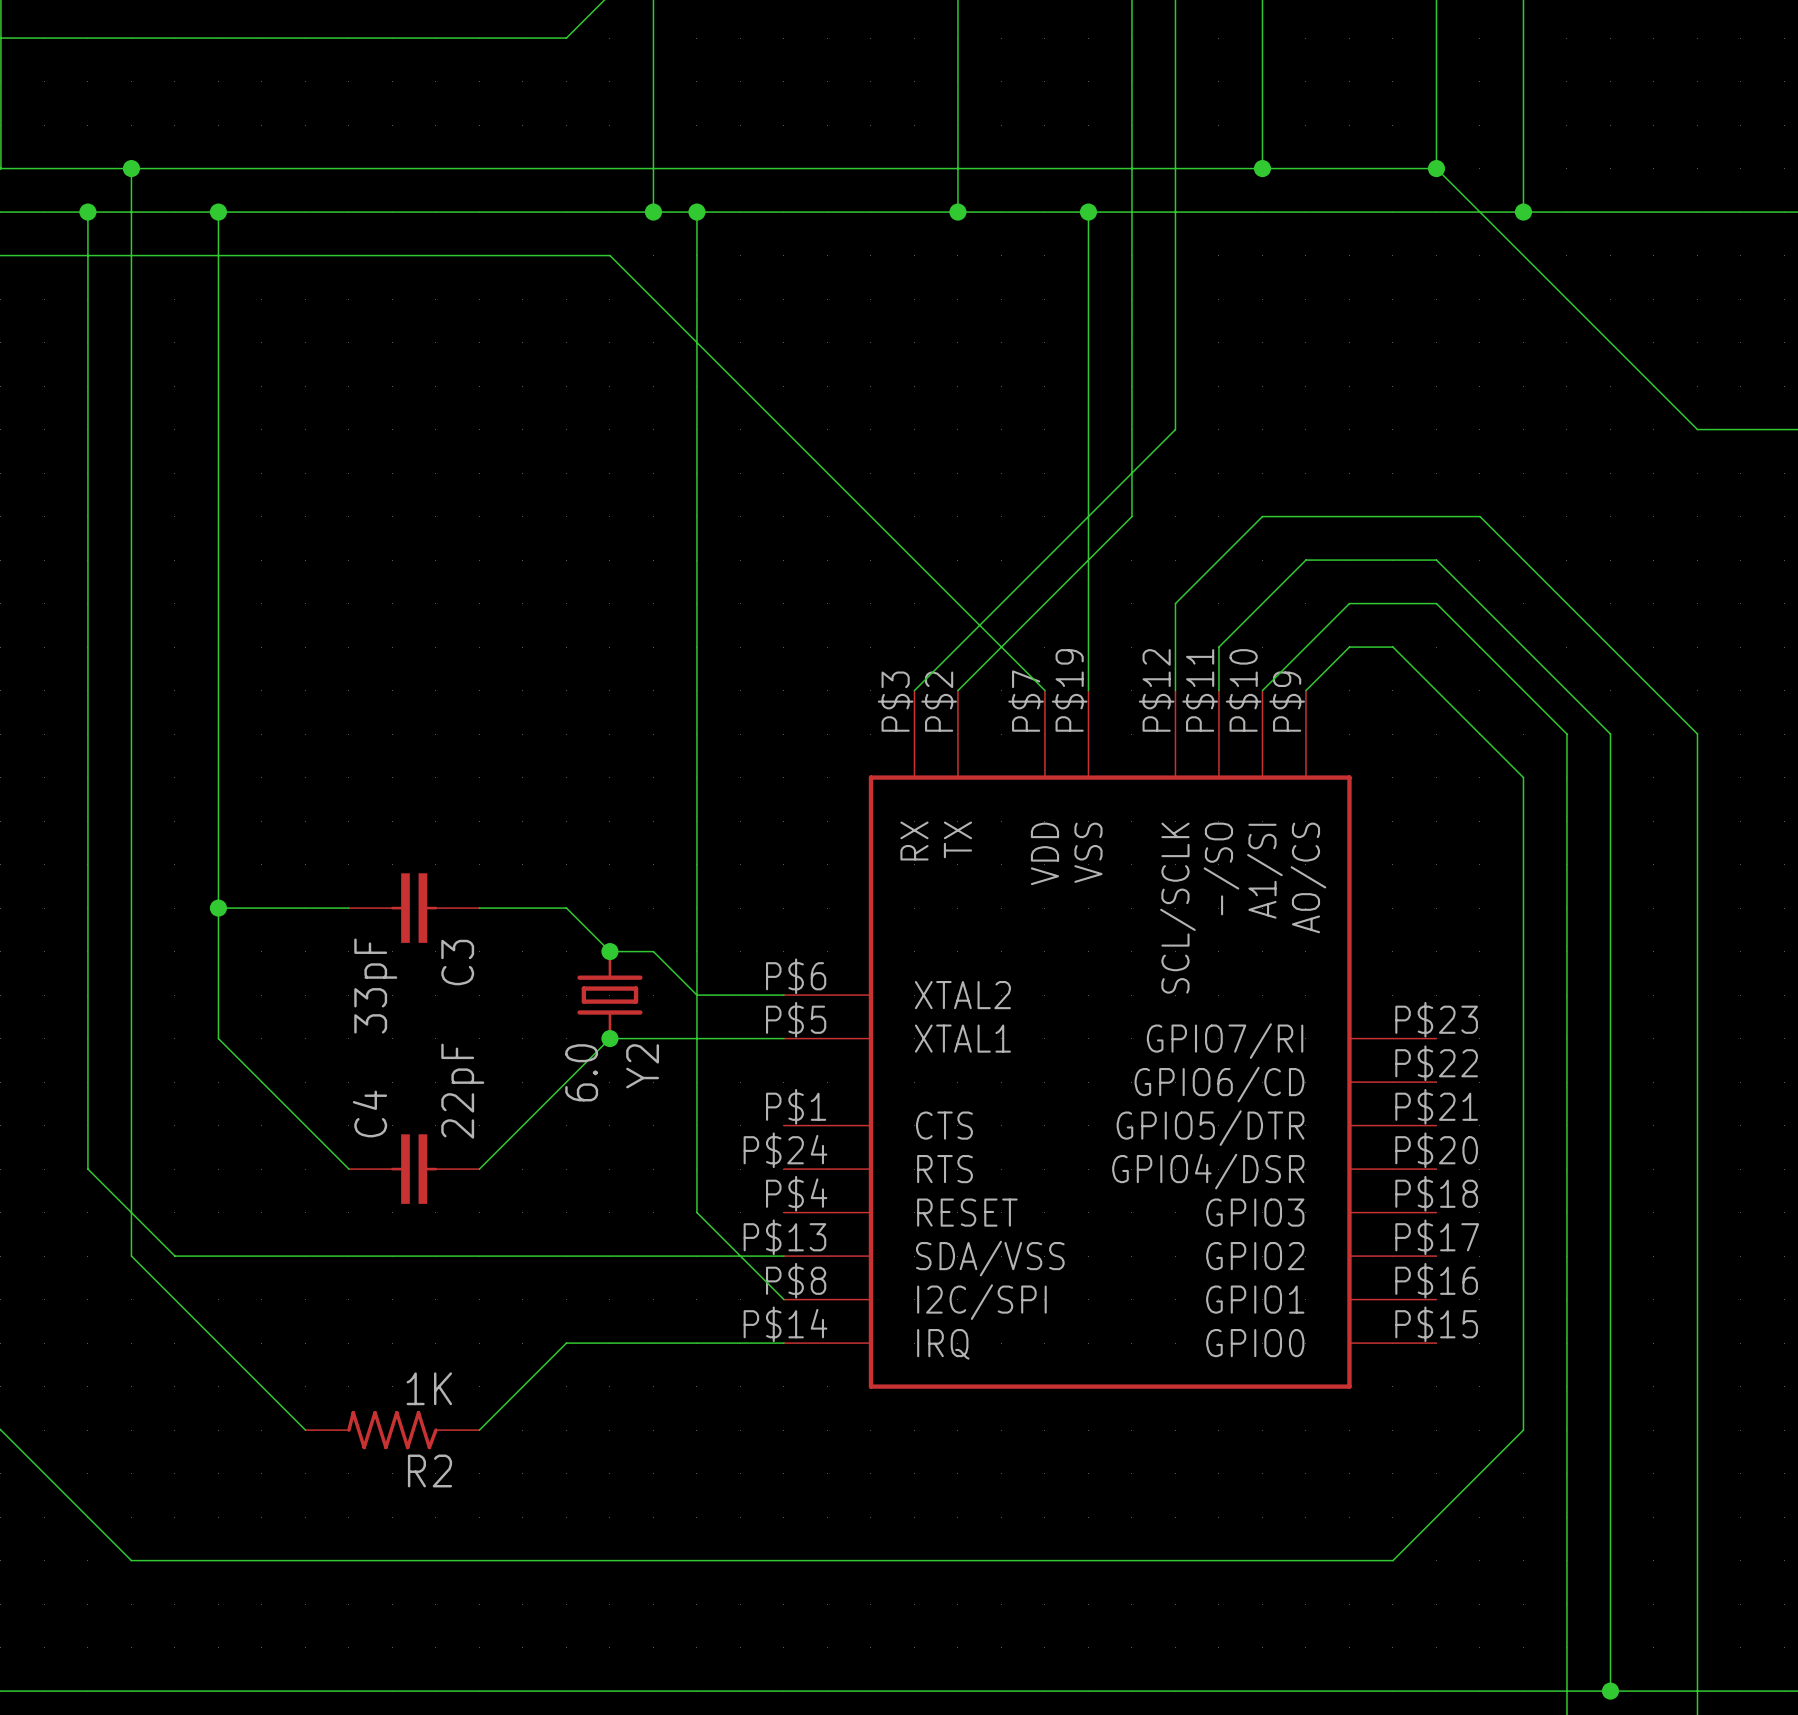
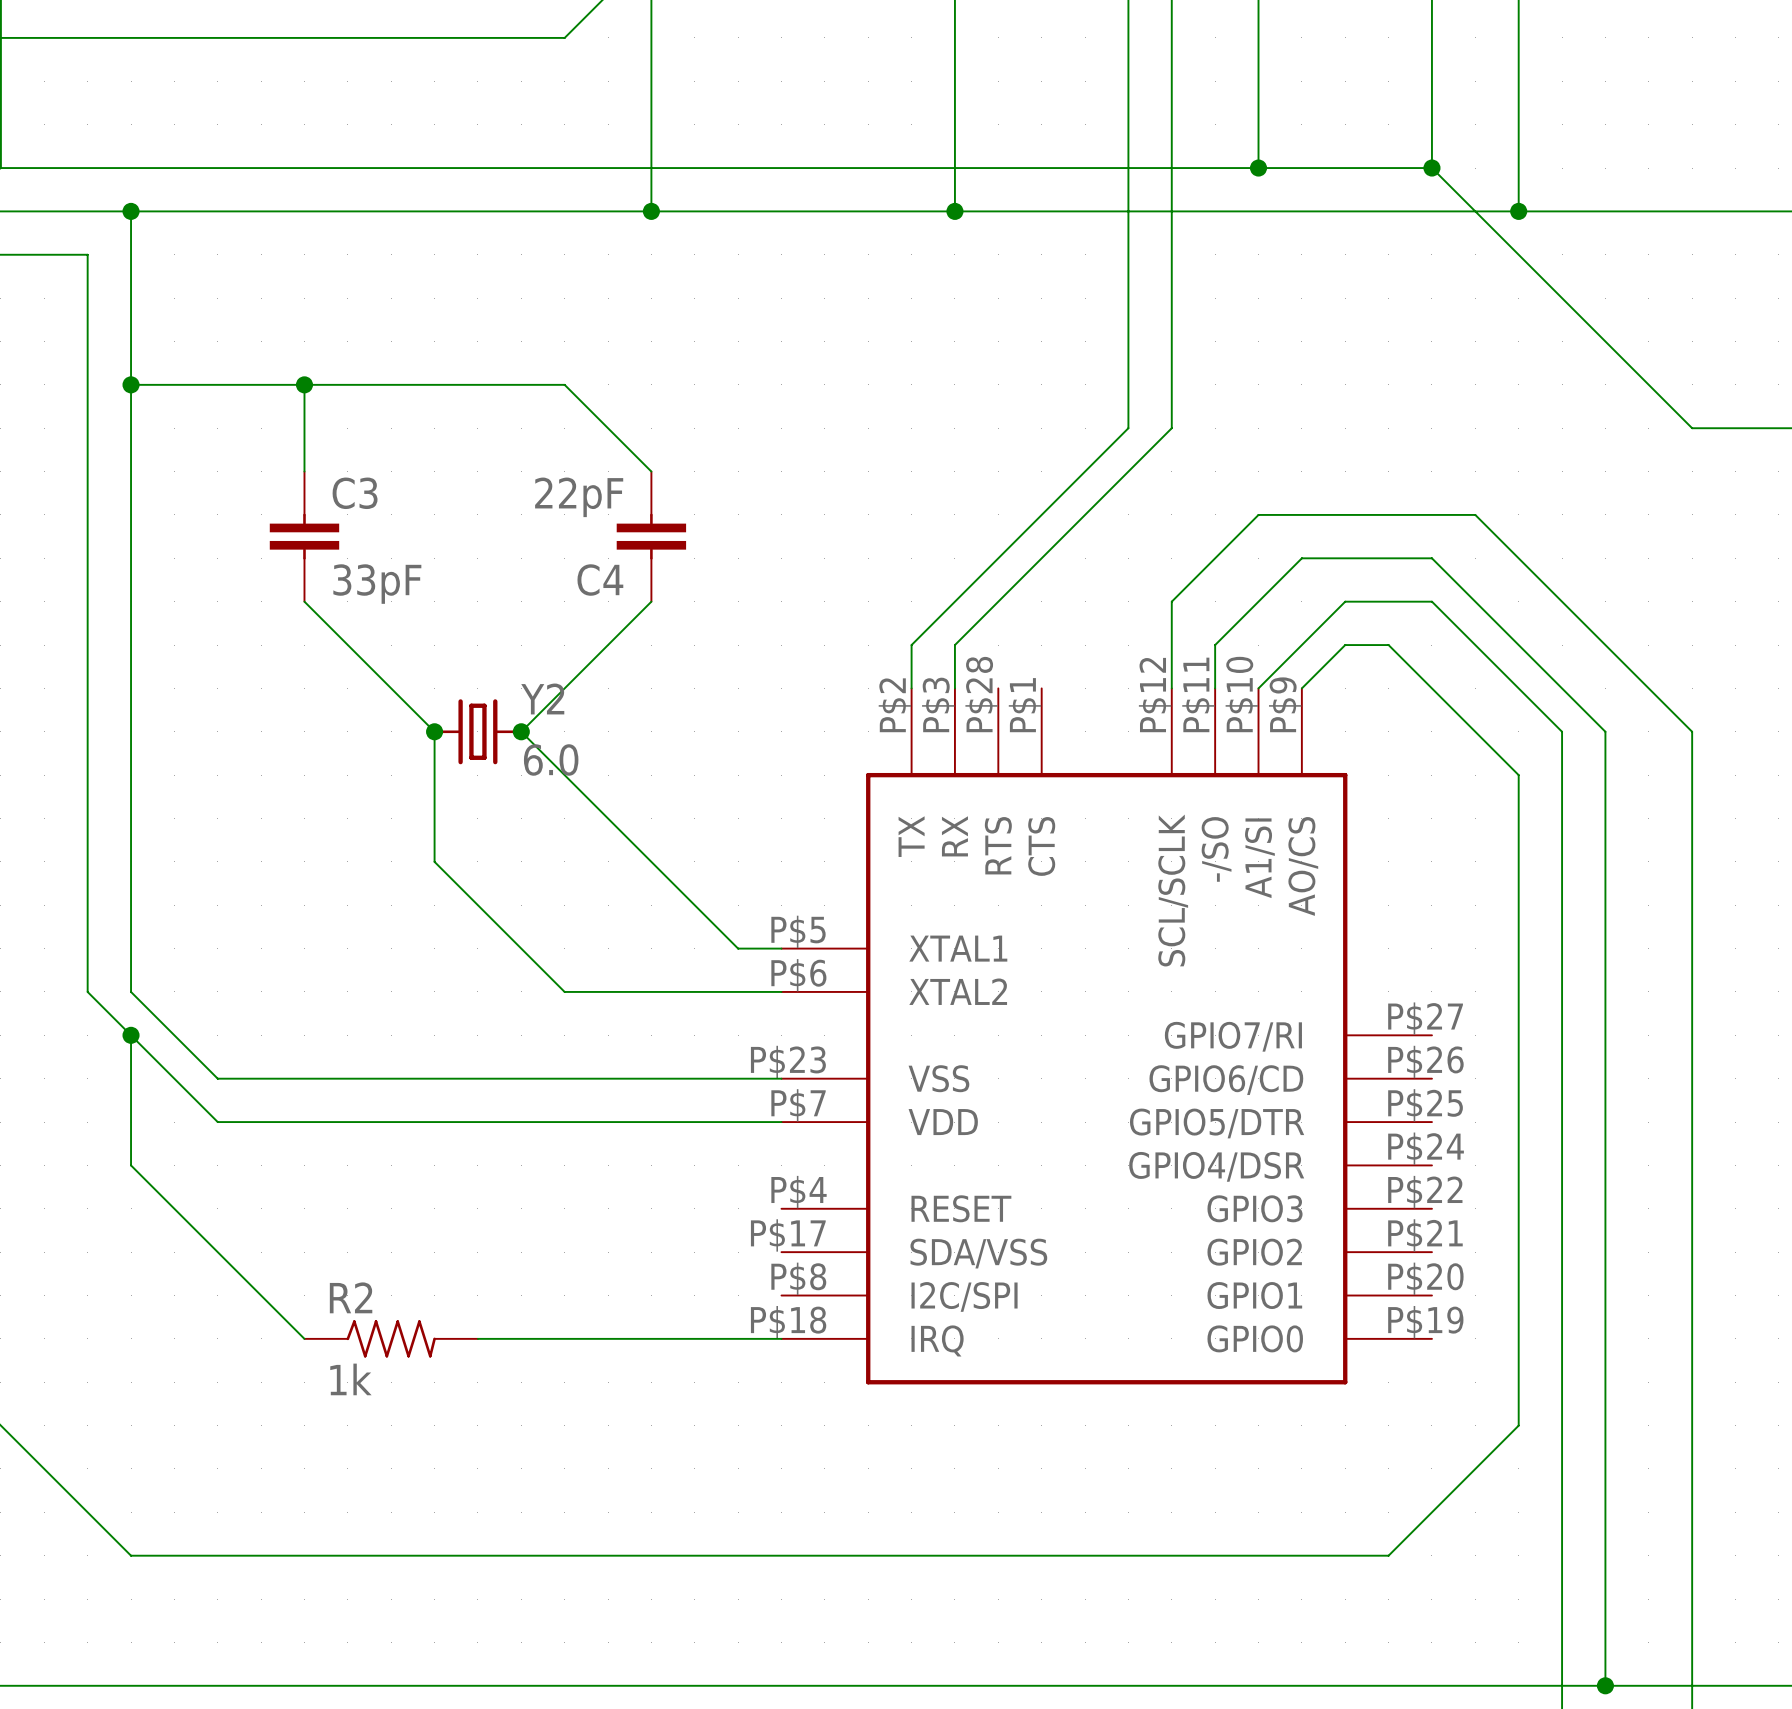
wire: (131, 168) (131, 212) -> none
junction: (131, 168) -> none
wire: (87, 212) (87, 255) (609, 255) (1044, 690) -> none
junction: (87, 212) -> none
junction: none -> (131, 211)
wire: (218, 212) (218, 1038) (348, 1169) -> none
junction: (218, 212) -> none
wire: (696, 212) (696, 1212) (783, 1299) -> none
junction: (696, 212) -> none
wire: (1088, 212) (1088, 690) -> none
junction: (1088, 212) -> none
wire: none -> (131, 384) (564, 384) (651, 471)
junction: none -> (131, 384)
wire: none -> (304, 384) (304, 471)
junction: none -> (304, 384)
wire: (1131, 429) (1131, 516) (957, 690) -> (1128, 428) (911, 645) (911, 688)
wire: none -> (651, 601) (521, 731) (738, 948) (781, 948)
wire: (957, 647) (914, 690) -> (954, 645) (954, 688)
part symbol: [783, 690, 1437, 1389] -> [781, 688, 1432, 1385]
junction: none -> (434, 731)
junction: none -> (521, 731)
wire: (218, 908) (348, 908) -> none
junction: (218, 908) -> none
C3 rotation: 0° (414, 908) -> 90° clockwise (304, 536)
C3 position: (414, 908) -> (304, 536)
wire: (479, 908) (566, 908) (609, 951) (653, 951) (696, 995) -> (304, 601) (434, 731) (434, 861) (564, 991) (694, 991)
junction: (609, 951) -> none
C3 name position: C3 (457, 962) -> C3 (355, 493)
C3 value position: 33pF (375, 986) -> 33pF (377, 584)
wire: (87, 995) (87, 1169) (174, 1256) (783, 1256) -> (87, 991) (217, 1122) (781, 1122)
wire: (131, 995) (131, 1038) -> (131, 991) (217, 1078) (781, 1078)
Y2 rotation: 0° (609, 995) -> 90° clockwise (477, 731)
Y2 position: (609, 995) -> (477, 731)
junction: none -> (131, 1035)
junction: (609, 1038) -> none
wire: (783, 1038) (609, 1038) (479, 1169) -> none
Y2 name position: Y2 (642, 1066) -> Y2 (542, 698)
Y2 value position: 6.0 (581, 1072) -> 6.0 (551, 759)
C4 value position: 22pF (462, 1091) -> 22pF (579, 497)
C4 name position: C4 (369, 1113) -> C4 (600, 580)
wire: (131, 1169) (131, 1256) (305, 1430) -> (131, 1165) (304, 1338)
C4 rotation: 0° (414, 1169) -> 90° clockwise (651, 536)
C4 position: (414, 1169) -> (651, 536)
wire: (566, 1343) (479, 1430) -> (564, 1338) (477, 1338)
R2 value: 1K (429, 1388) -> 1k (350, 1379)
R2 symbol: [305, 1410, 480, 1450] -> [304, 1320, 478, 1358]
R2 name position: R2 (429, 1470) -> R2 (351, 1297)

